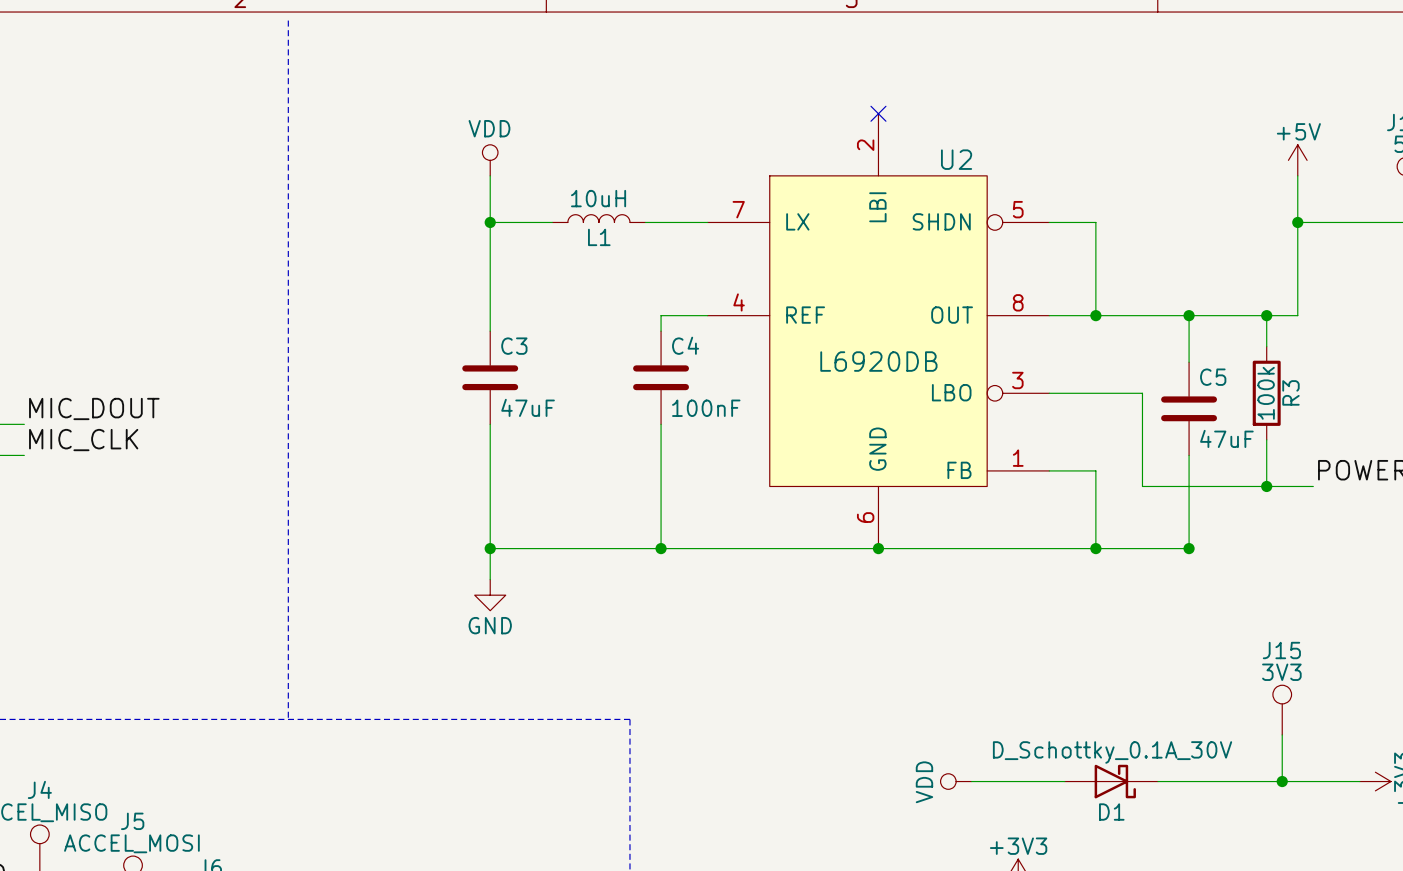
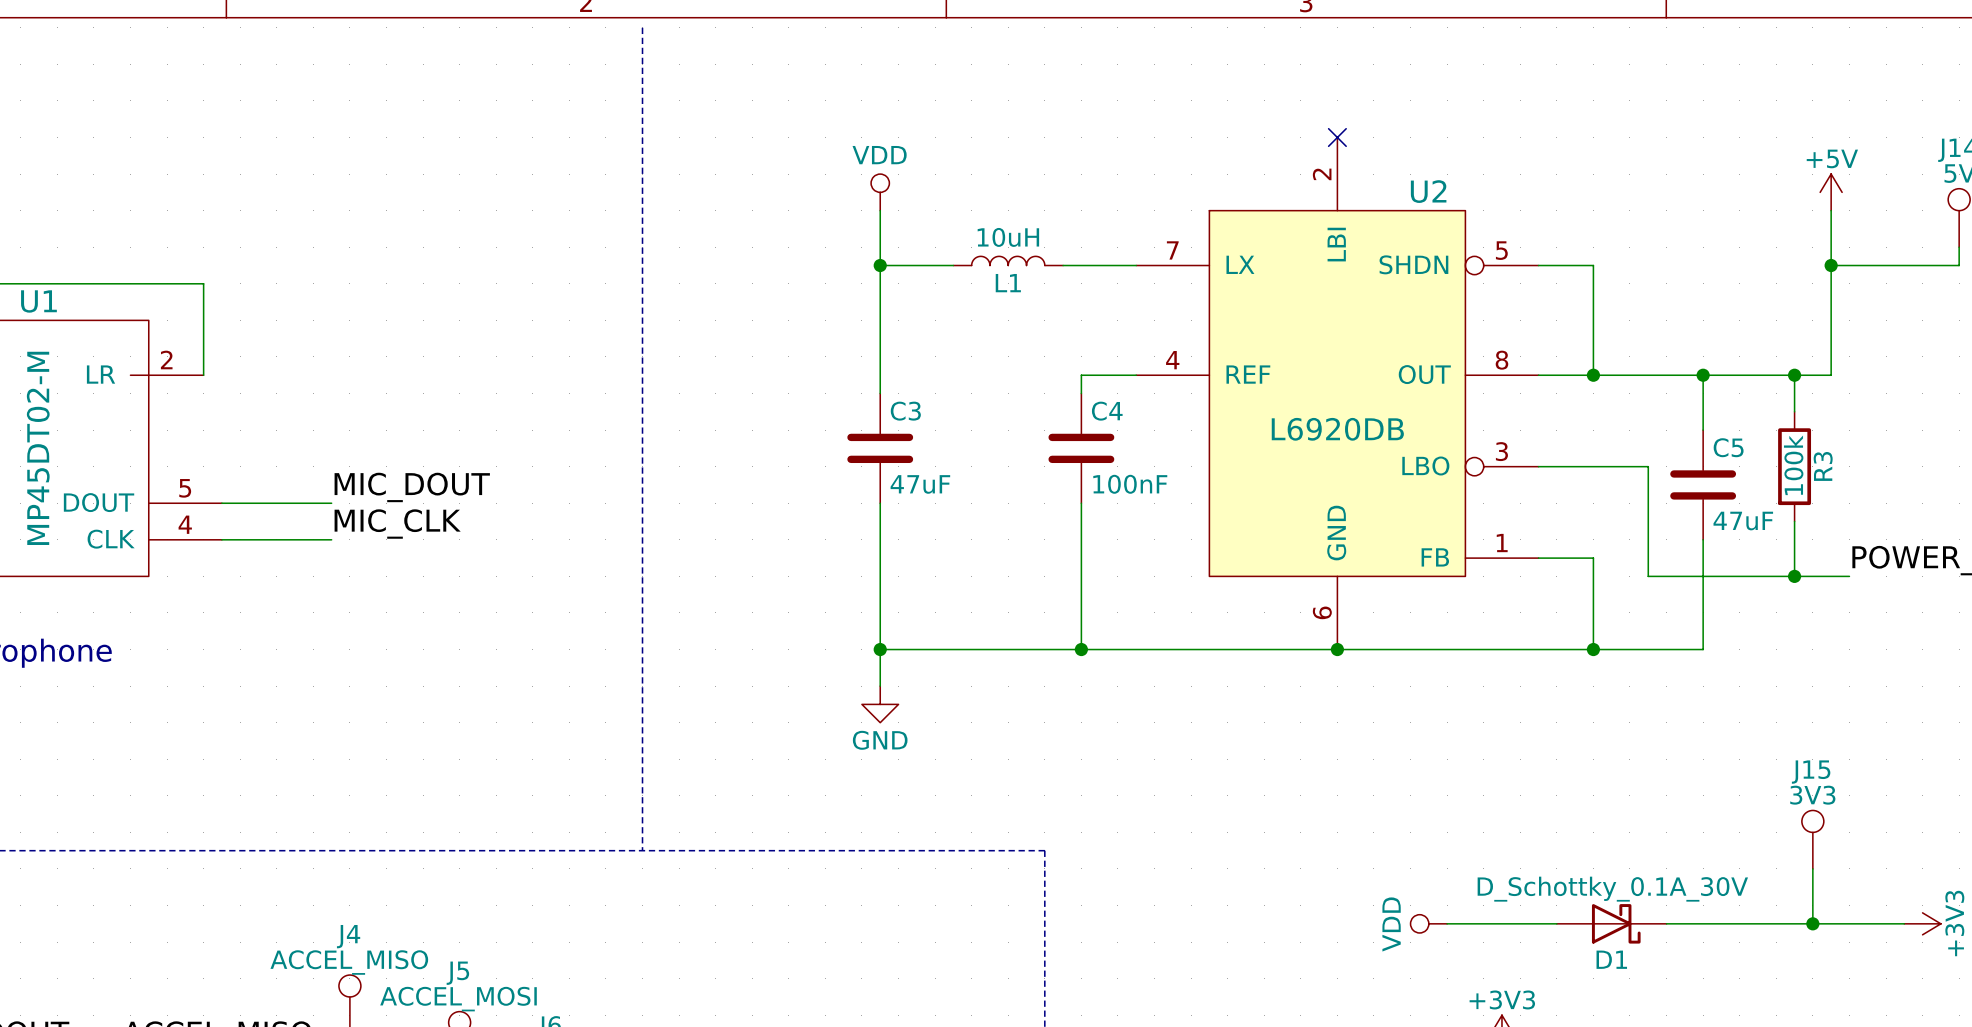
junction: (1189, 548) -> none

